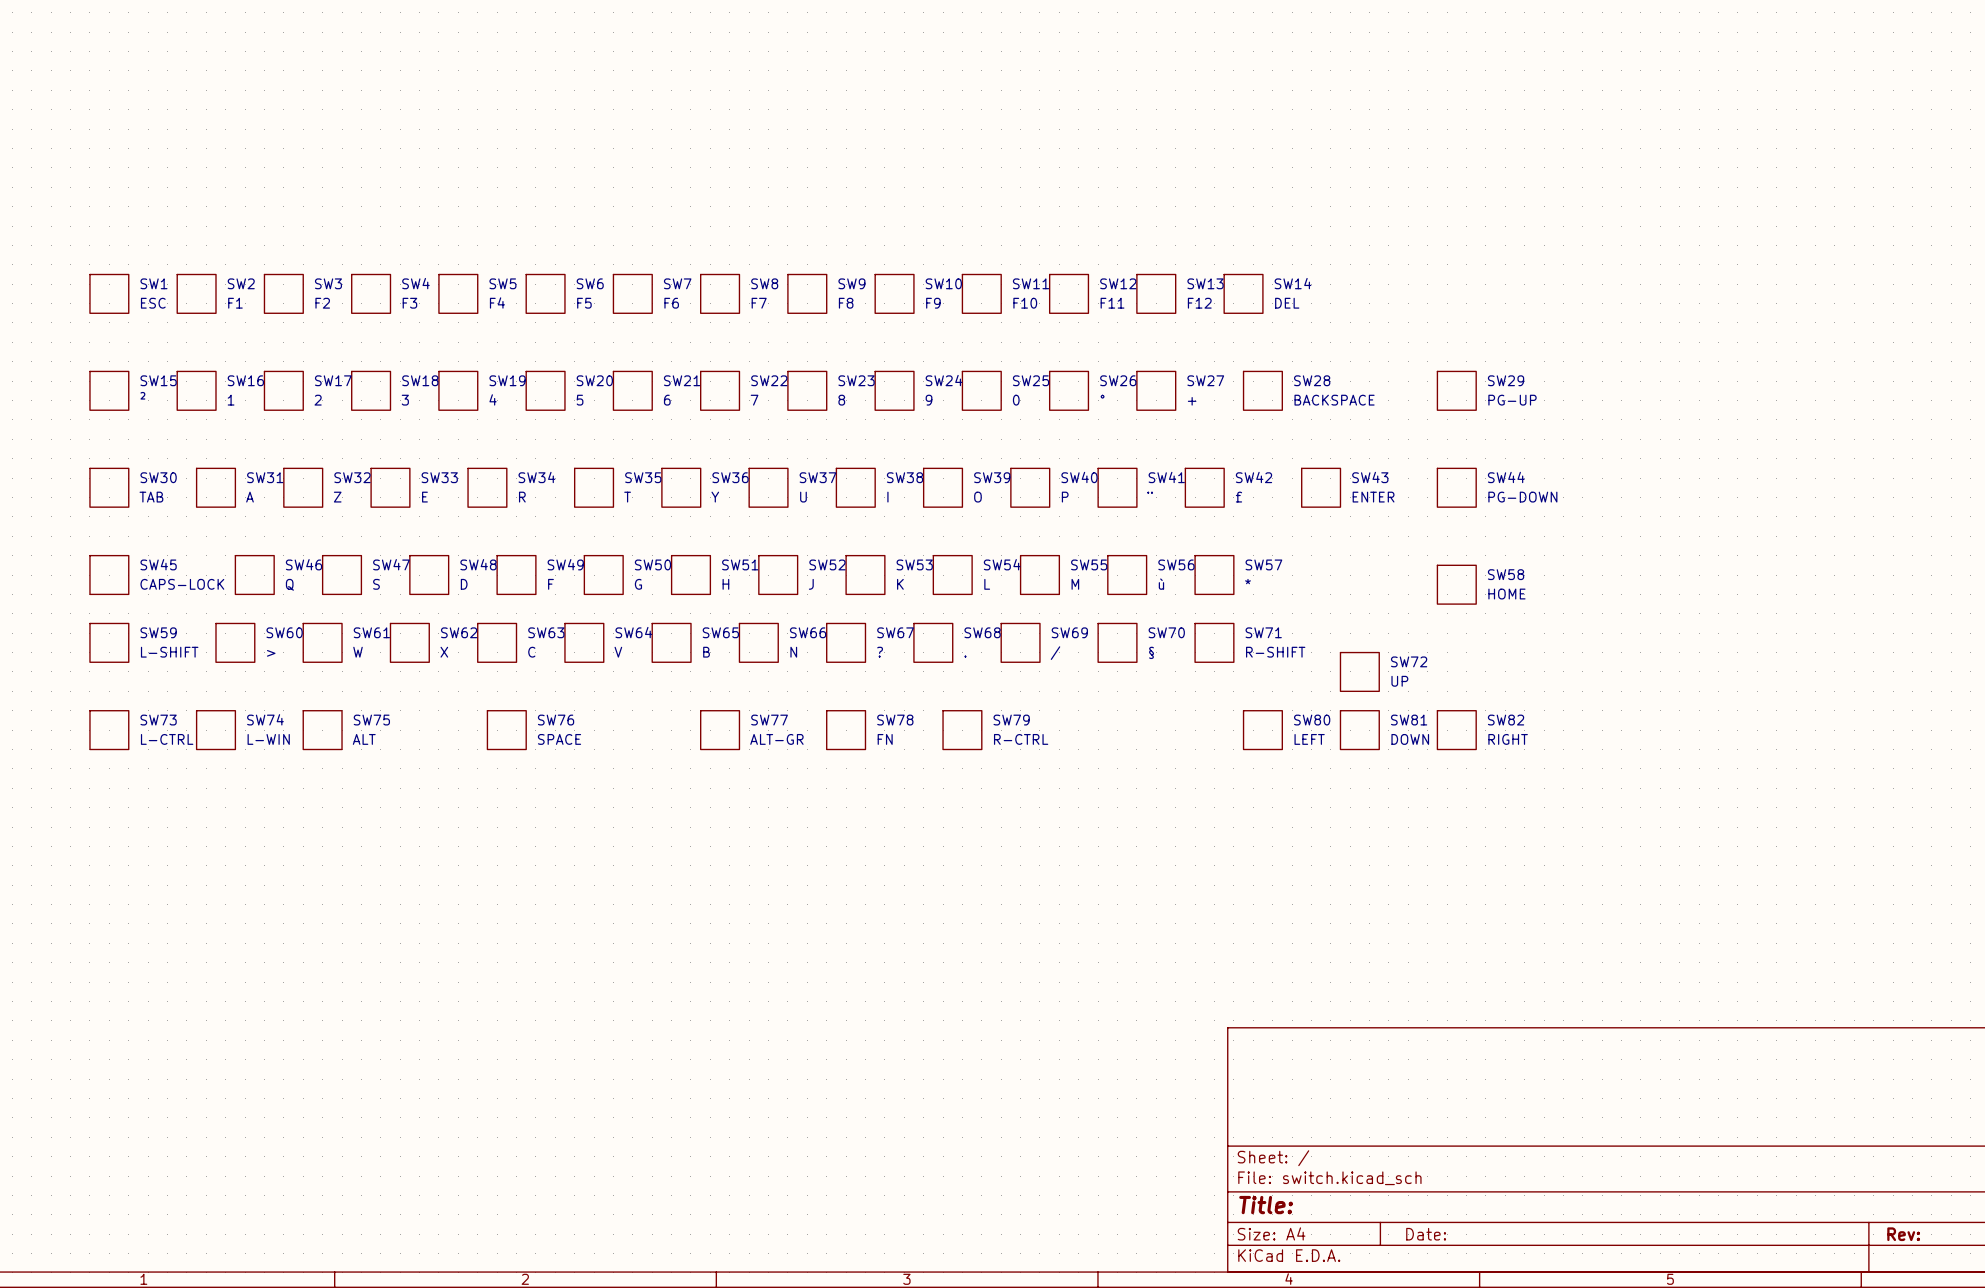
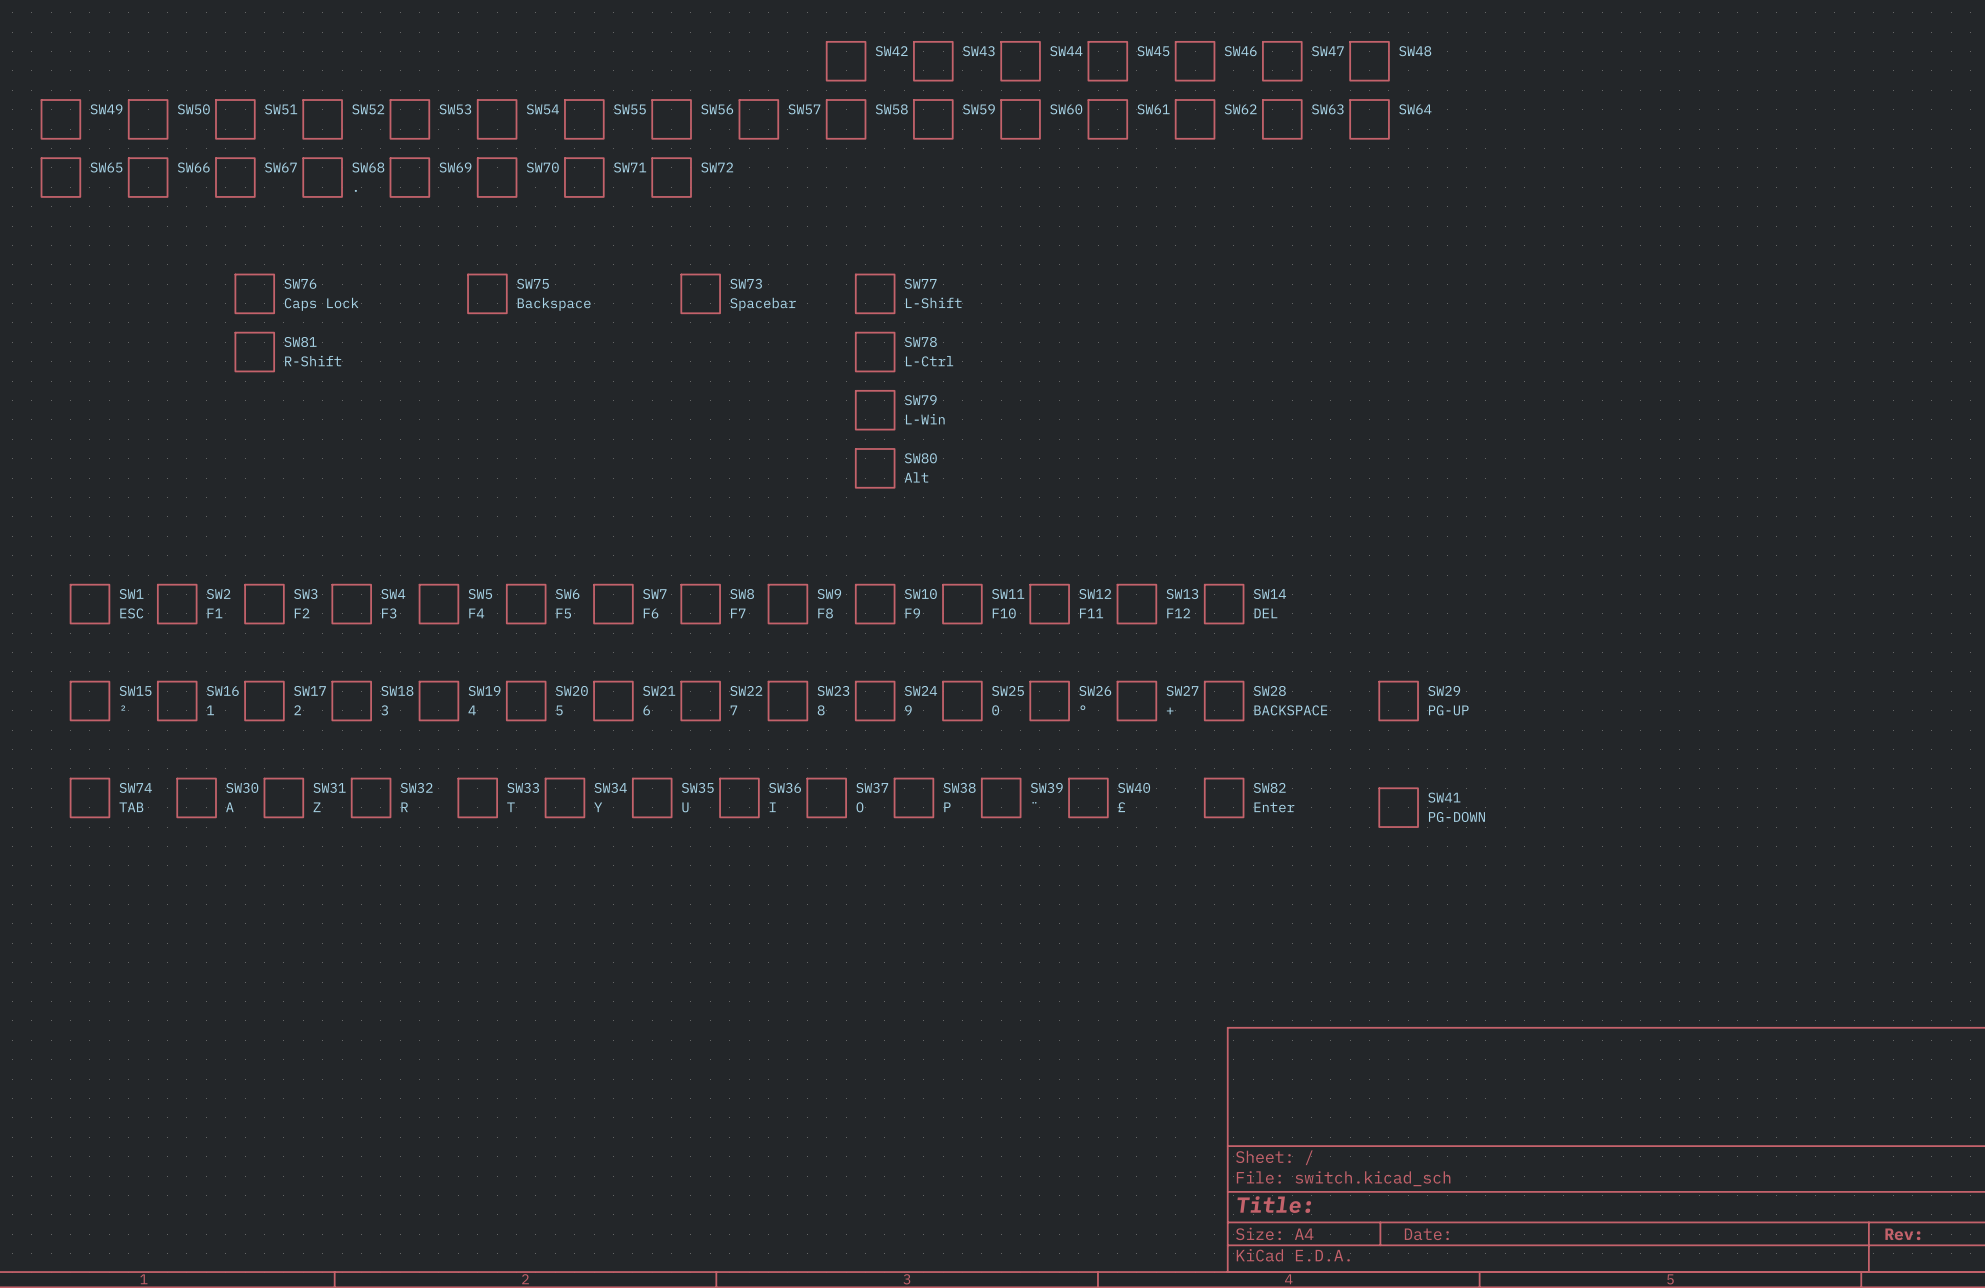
SW1 position: (109, 293) -> (89, 604)
SW2 position: (196, 293) -> (177, 604)
SW3 position: (283, 293) -> (264, 604)
SW4 position: (371, 293) -> (351, 604)
SW5 position: (458, 293) -> (438, 604)
SW6 position: (545, 293) -> (526, 604)
SW7 position: (632, 293) -> (613, 604)
SW8 position: (720, 293) -> (700, 604)
SW9 position: (807, 293) -> (787, 604)
SW10 position: (894, 293) -> (875, 604)
SW11 position: (981, 293) -> (962, 604)
SW12 position: (1069, 293) -> (1049, 604)
SW13 position: (1156, 293) -> (1136, 604)
SW14 position: (1243, 293) -> (1224, 604)
SW15 position: (109, 390) -> (89, 701)
SW16 position: (196, 390) -> (177, 701)
SW17 position: (283, 390) -> (264, 701)
SW18 position: (371, 390) -> (351, 701)
SW19 position: (458, 390) -> (438, 701)
SW20 position: (545, 390) -> (526, 701)
SW21 position: (632, 390) -> (613, 701)
SW22 position: (720, 390) -> (700, 701)
SW23 position: (807, 390) -> (787, 701)
SW24 position: (894, 390) -> (875, 701)
SW25 position: (981, 390) -> (962, 701)
SW26 position: (1069, 390) -> (1049, 701)
SW27 position: (1156, 390) -> (1136, 701)
SW28 position: (1262, 390) -> (1224, 701)
SW29 position: (1456, 390) -> (1398, 701)
SW30 position: (109, 487) -> (196, 797)
SW31 position: (215, 487) -> (283, 797)
SW32 position: (303, 487) -> (371, 797)
SW33 position: (390, 487) -> (477, 797)
SW34 position: (487, 487) -> (564, 797)
SW35 position: (594, 487) -> (652, 797)
SW36 position: (681, 487) -> (739, 797)
SW37 position: (768, 487) -> (826, 797)
SW38 position: (855, 487) -> (913, 797)
SW39 position: (943, 487) -> (1001, 797)
SW40 position: (1030, 487) -> (1088, 797)
SW41 position: (1117, 487) -> (1398, 807)
SW42 position: (1204, 487) -> (846, 61)
SW43 position: (1321, 487) -> (933, 61)
SW44 position: (1456, 487) -> (1020, 61)
SW41 value: ¨ (1150, 492) -> PG-DOWN (1456, 816)
SW30 value: TAB (151, 497) -> A (229, 807)
SW31 value: A (249, 497) -> Z (317, 807)
SW32 value: Z (337, 497) -> R (404, 807)
SW33 value: E (424, 497) -> T (510, 807)
SW34 value: R (522, 497) -> Y (598, 807)
SW35 value: T (627, 497) -> U (685, 807)
SW36 value: Y (715, 497) -> I (772, 807)
SW37 value: U (803, 497) -> O (859, 807)
SW38 value: I (887, 497) -> P (947, 807)
SW39 value: O (977, 497) -> ¨ (1034, 802)
SW40 value: P (1065, 497) -> £ (1121, 807)
SW42 value: £ (1238, 497) -> none
SW43 value: ENTER (1373, 497) -> none
SW44 value: PG-DOWN (1522, 497) -> none
SW45 position: (109, 575) -> (1107, 61)
SW46 position: (254, 575) -> (1195, 61)
SW47 position: (342, 575) -> (1282, 61)
SW48 position: (429, 575) -> (1369, 61)
SW49 position: (516, 575) -> (60, 119)
SW50 position: (603, 575) -> (148, 119)
SW51 position: (690, 575) -> (235, 119)
SW52 position: (778, 575) -> (322, 119)
SW53 position: (865, 575) -> (409, 119)
SW54 position: (952, 575) -> (497, 119)
SW55 position: (1039, 575) -> (584, 119)
SW56 position: (1127, 575) -> (671, 119)
SW57 position: (1214, 575) -> (758, 119)
SW57 value: * (1247, 581) -> none
SW45 value: CAPS-LOCK (182, 584) -> none
SW46 value: Q (289, 584) -> none
SW47 value: S (376, 584) -> none
SW48 value: D (464, 584) -> none
SW49 value: F (550, 584) -> none
SW50 value: G (638, 584) -> none
SW51 value: H (725, 584) -> none
SW52 value: J (811, 584) -> none
SW53 value: K (900, 584) -> none
SW54 value: L (987, 584) -> none
SW55 value: M (1075, 584) -> none
SW56 value: ù (1161, 584) -> none
SW58 position: (1456, 584) -> (846, 119)
SW58 value: HOME (1506, 594) -> none
SW59 position: (109, 642) -> (933, 119)
SW60 position: (235, 642) -> (1020, 119)
SW61 position: (322, 642) -> (1107, 119)
SW62 position: (409, 642) -> (1195, 119)
SW63 position: (497, 642) -> (1282, 119)
SW64 position: (584, 642) -> (1369, 119)
SW65 position: (671, 642) -> (60, 177)
SW66 position: (758, 642) -> (148, 177)
SW67 position: (846, 642) -> (235, 177)
SW68 position: (933, 642) -> (322, 177)
SW69 position: (1020, 642) -> (409, 177)
SW70 position: (1117, 642) -> (497, 177)
SW71 position: (1214, 642) -> (584, 177)
SW59 value: L-SHIFT (169, 652) -> none
SW61 value: W (358, 652) -> none
SW62 value: X (444, 652) -> none
SW63 value: C (531, 652) -> none
SW64 value: V (618, 652) -> none
SW65 value: B (706, 652) -> none
SW66 value: N (793, 652) -> none
SW67 value: ? (880, 652) -> none
SW70 value: § (1151, 652) -> none
SW71 value: R-SHIFT (1275, 652) -> none
SW60 value: > (271, 653) -> none
SW69 value: / (1055, 653) -> none
SW72 position: (1359, 671) -> (671, 177)
SW72 value: UP (1399, 681) -> none
SW73 position: (109, 730) -> (700, 293)
SW74 position: (215, 730) -> (89, 797)
SW75 position: (322, 730) -> (487, 293)
SW76 position: (506, 730) -> (254, 293)
SW77 position: (720, 730) -> (875, 293)
SW78 position: (846, 730) -> (875, 352)
SW79 position: (962, 730) -> (875, 410)
SW80 position: (1262, 730) -> (875, 468)
SW81 position: (1359, 730) -> (254, 352)
SW82 position: (1456, 730) -> (1224, 797)
SW73 value: L-CTRL (167, 739) -> Spacebar (763, 304)
SW74 value: L-WIN (268, 739) -> TAB (131, 807)
SW75 value: ALT (364, 739) -> Backspace (554, 304)
SW76 value: SPACE (559, 739) -> Caps Lock (321, 304)
SW77 value: ALT-GR (776, 739) -> L-Shift (933, 302)
SW78 value: FN (885, 739) -> L-Ctrl (929, 361)
SW79 value: R-CTRL (1021, 739) -> L-Win (925, 419)
SW80 value: LEFT (1309, 739) -> Alt (916, 477)
SW81 value: DOWN (1410, 739) -> R-Shift (313, 361)
SW82 value: RIGHT (1508, 739) -> Enter (1274, 807)

